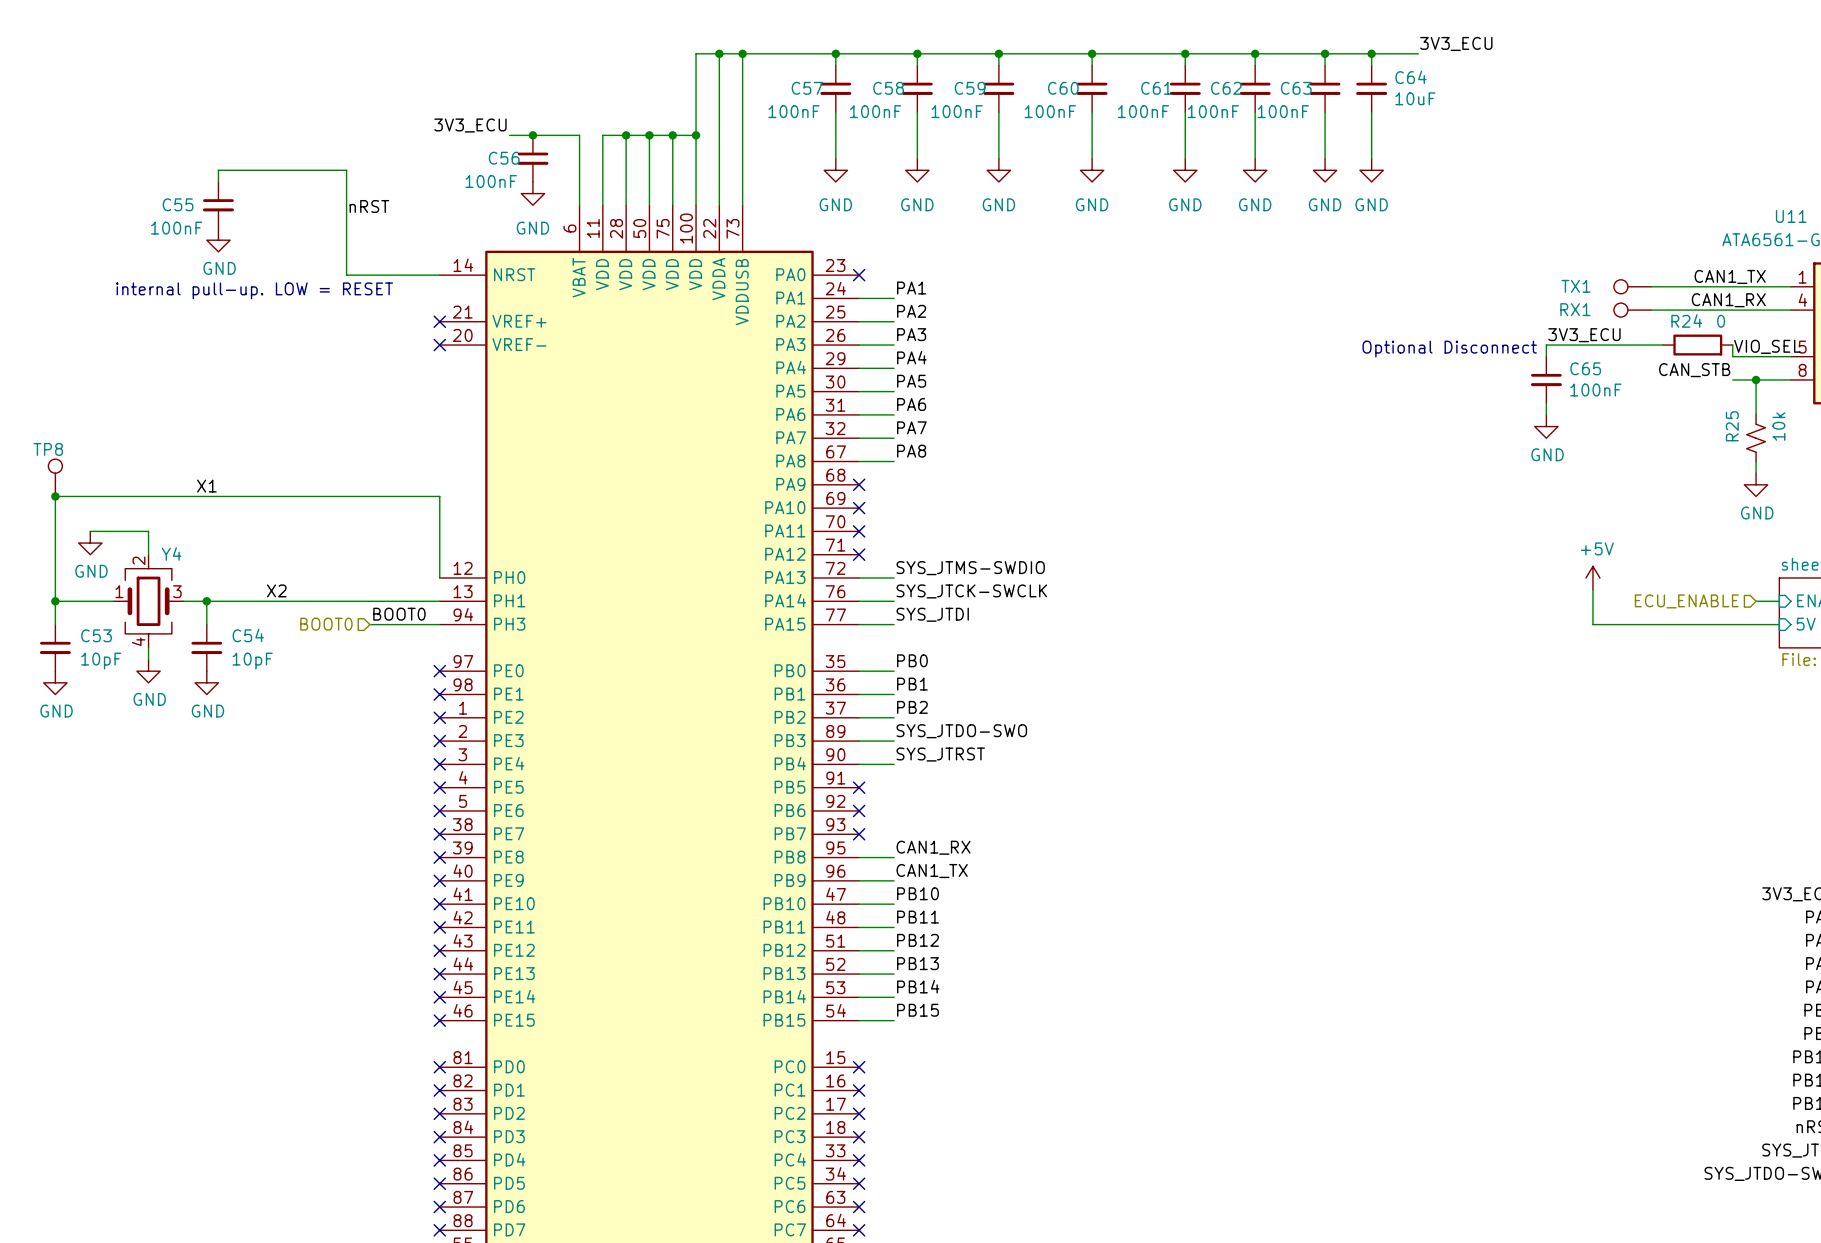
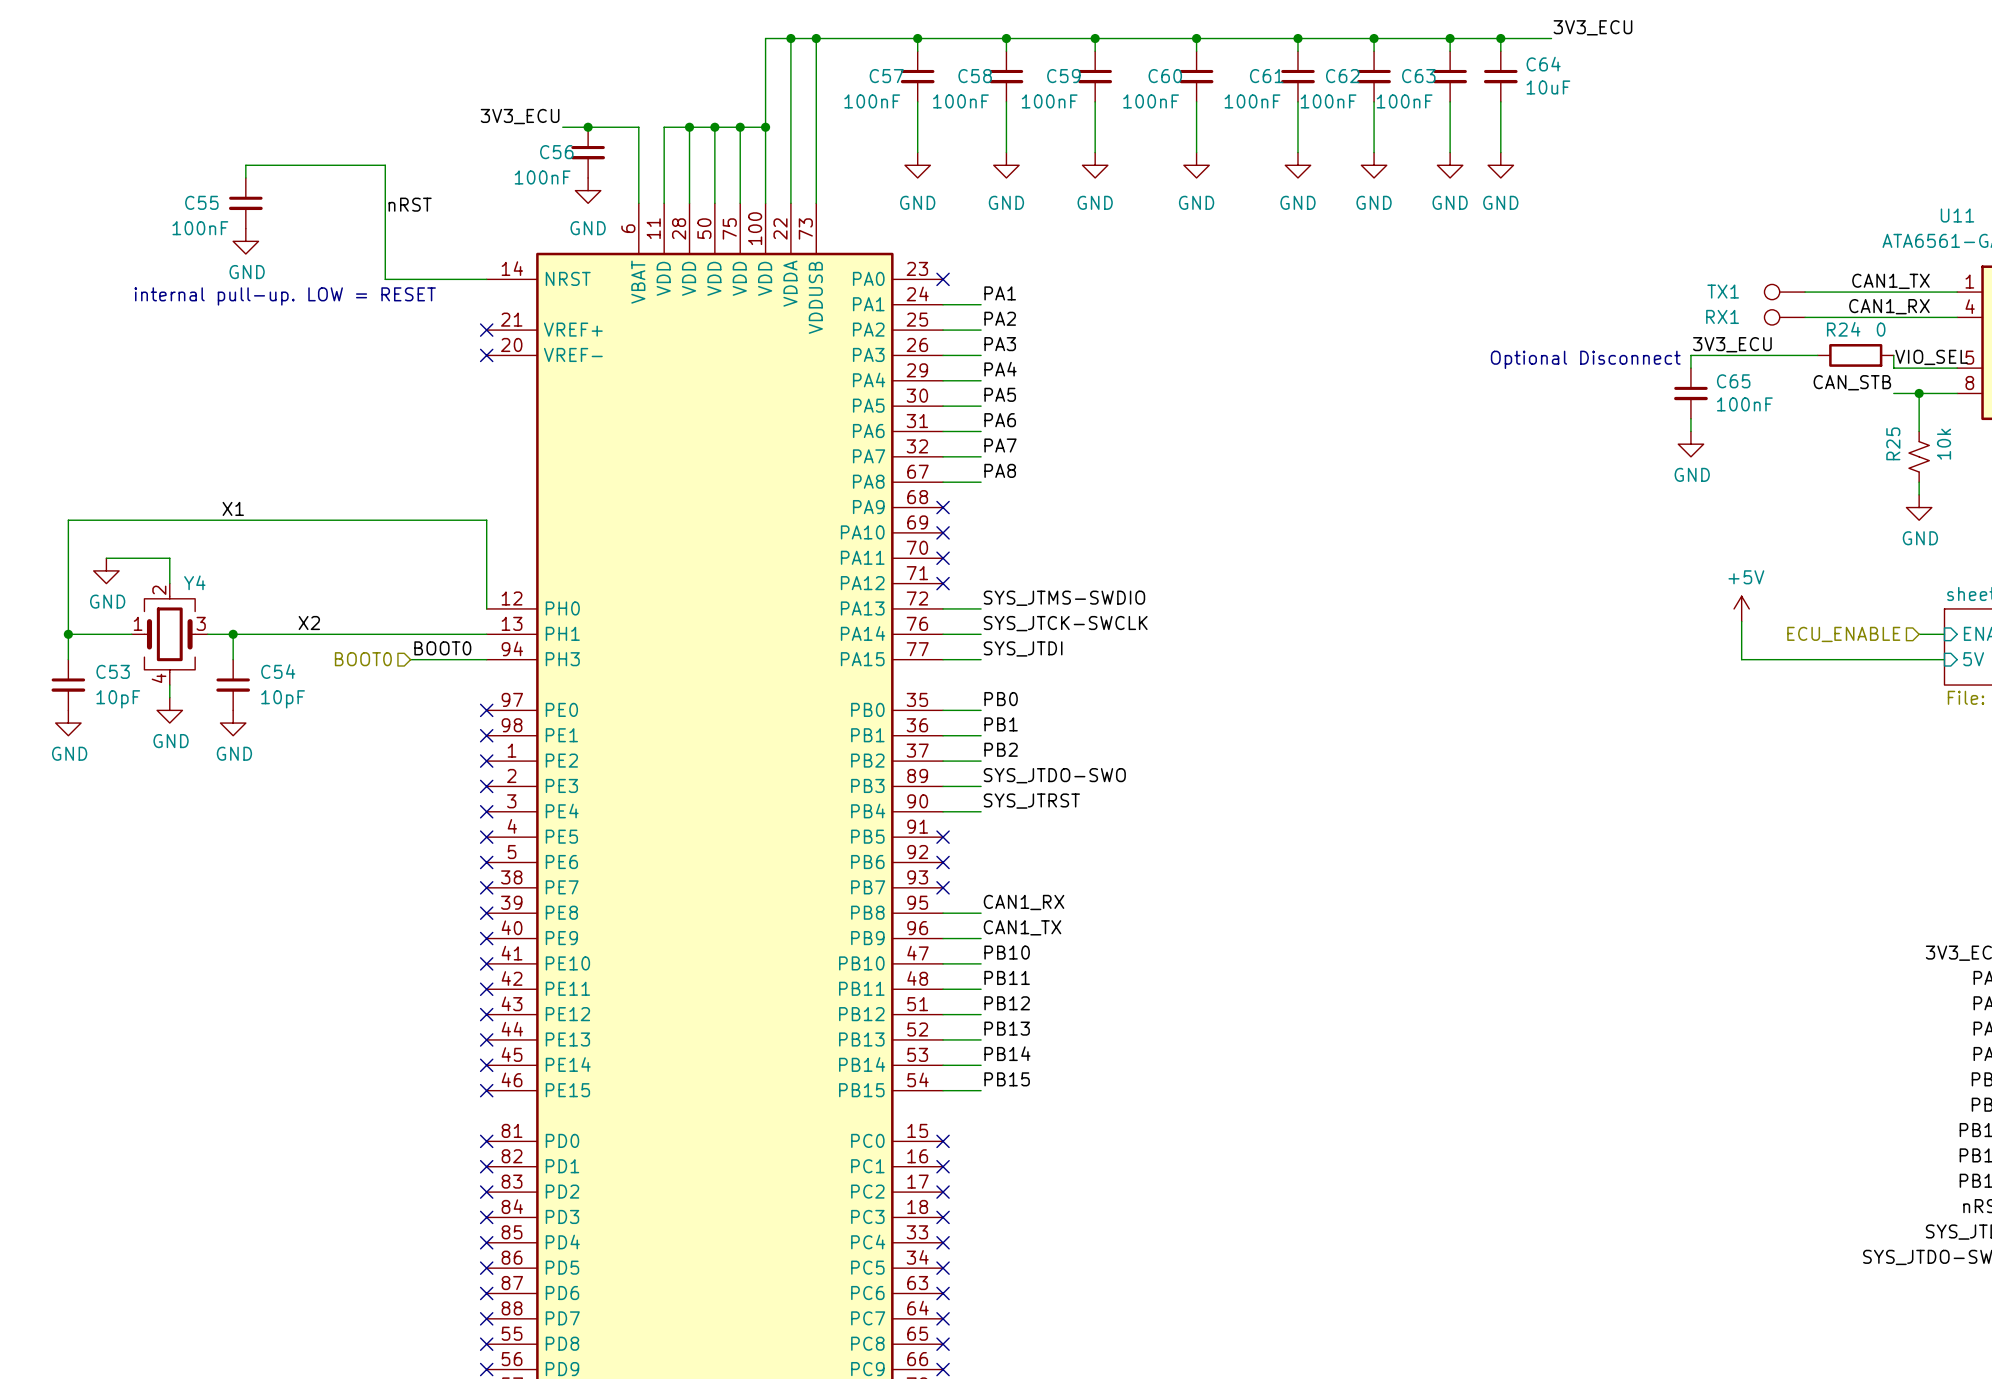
TP8: (55, 477) -> none
junction: (55, 496) -> none

